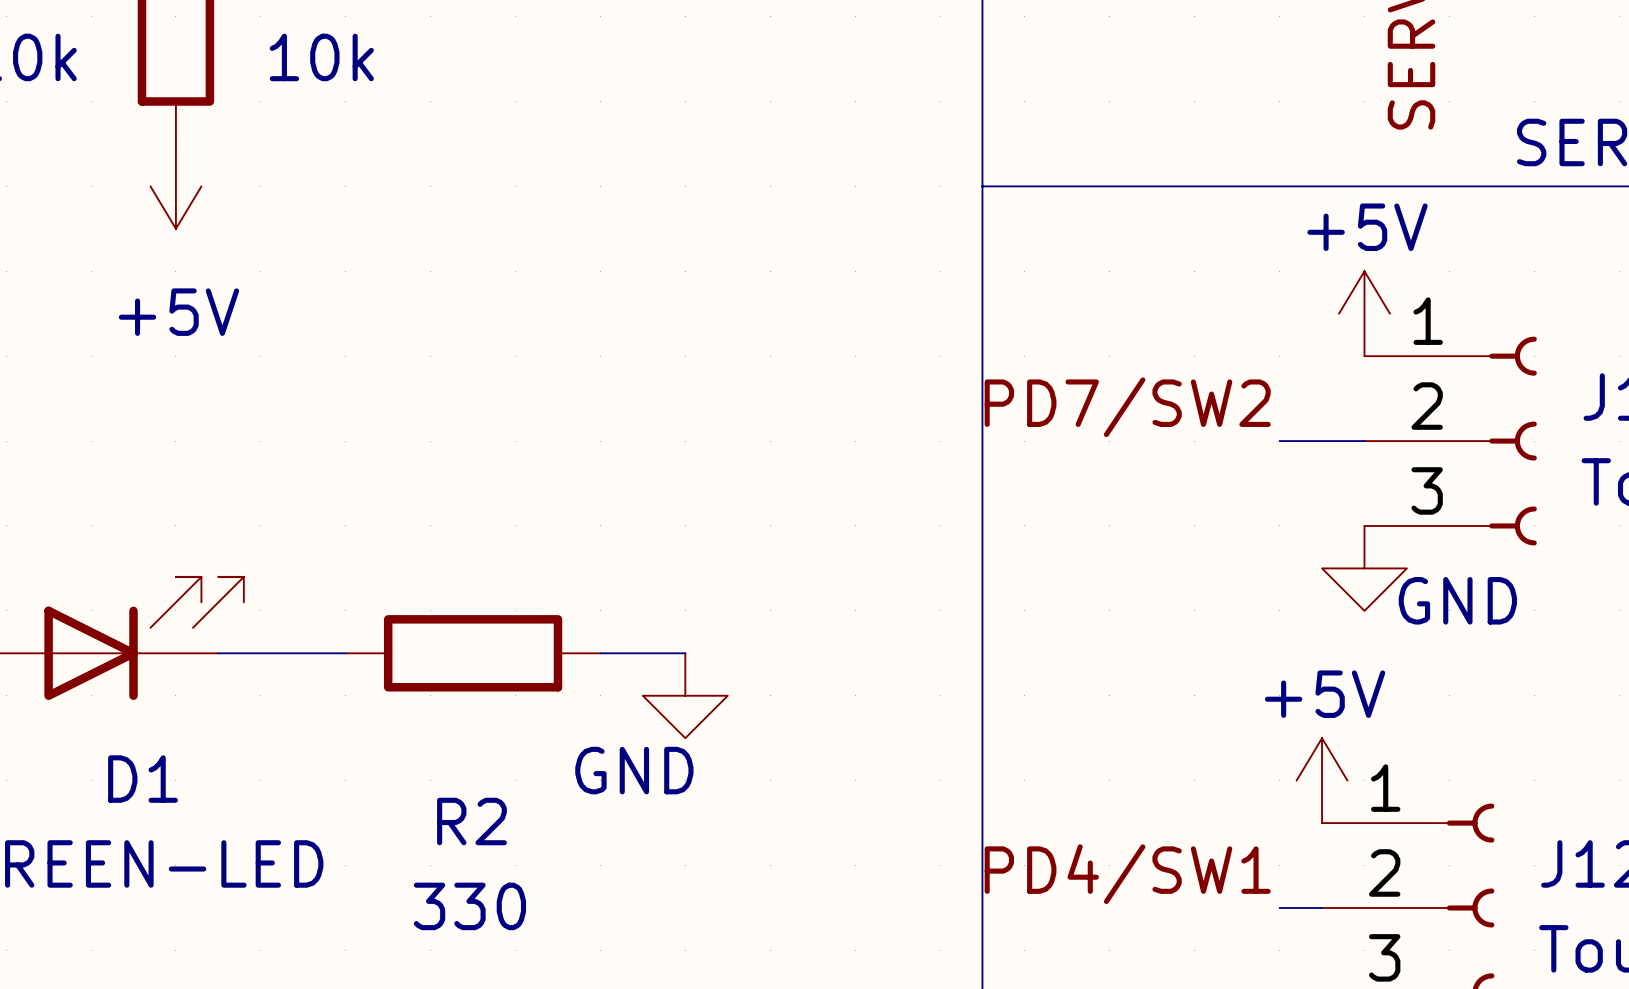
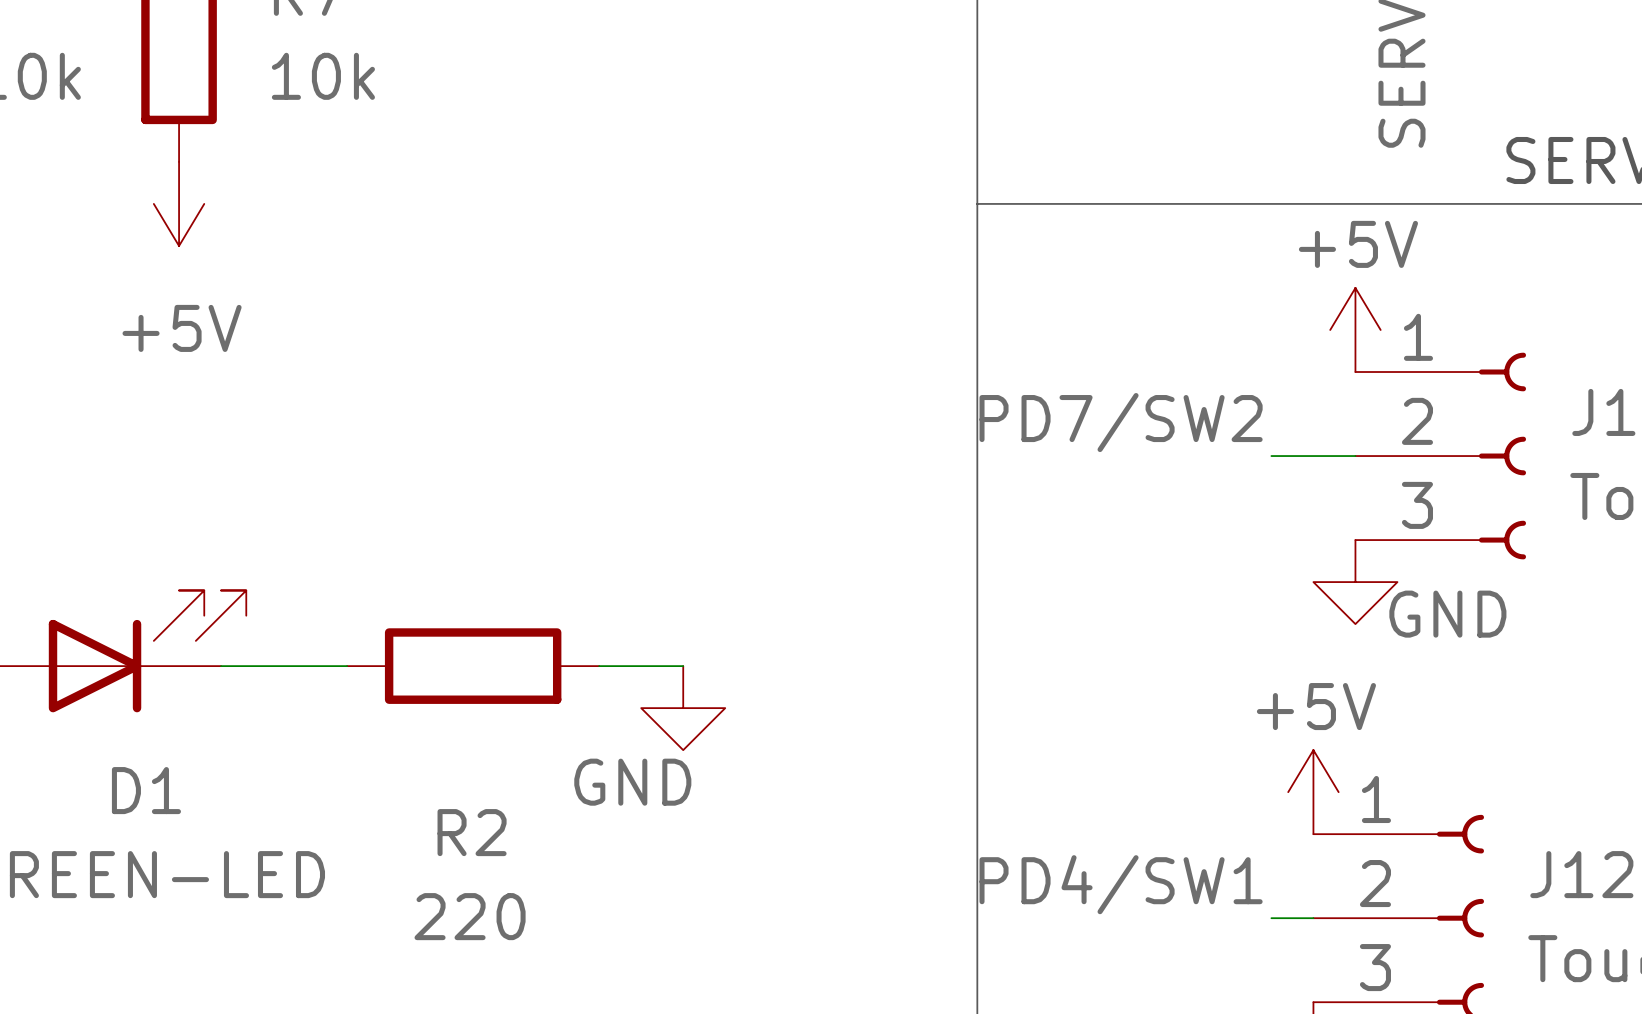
R2 value: 330 (469, 906) -> 220 (470, 916)

